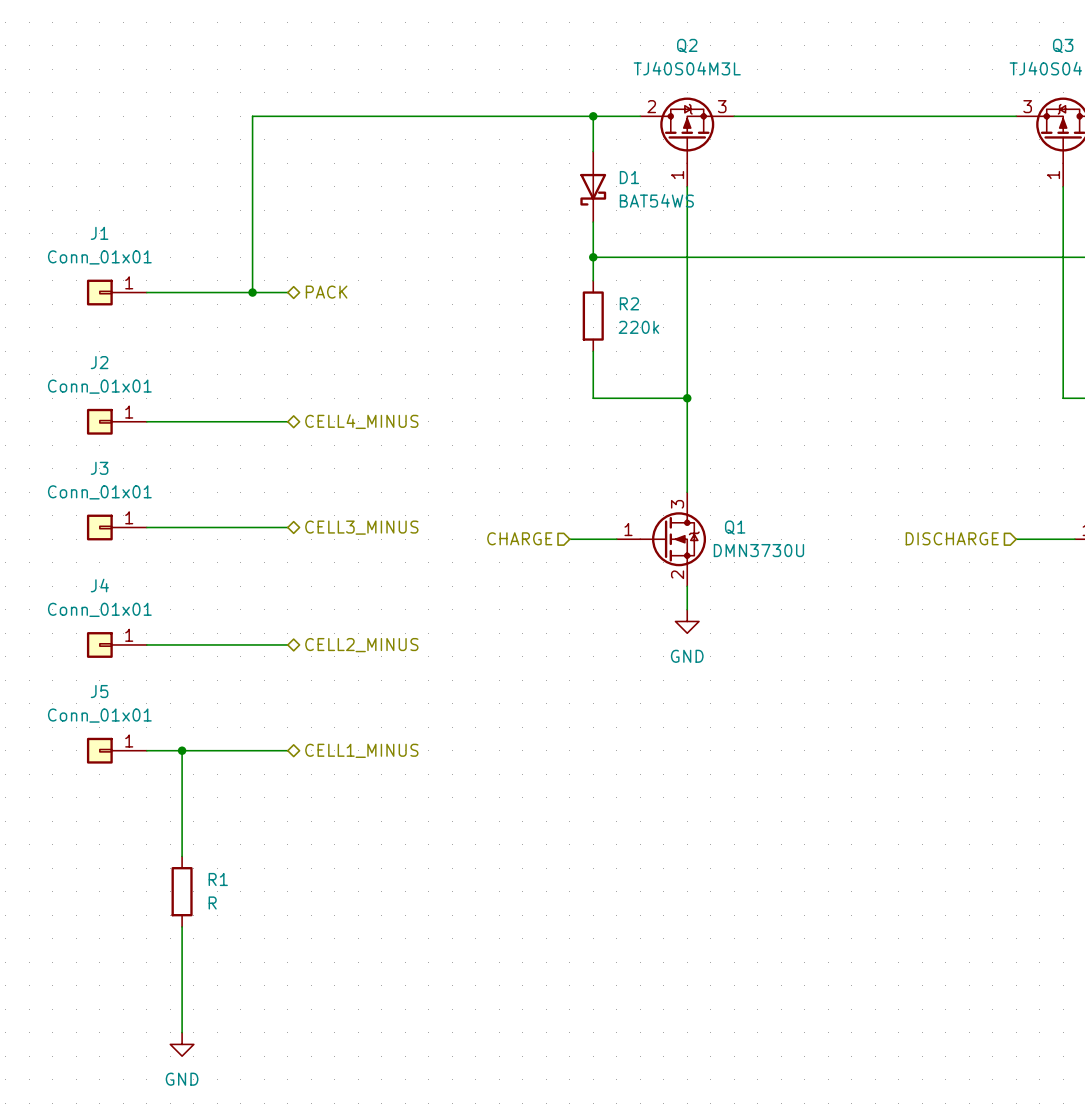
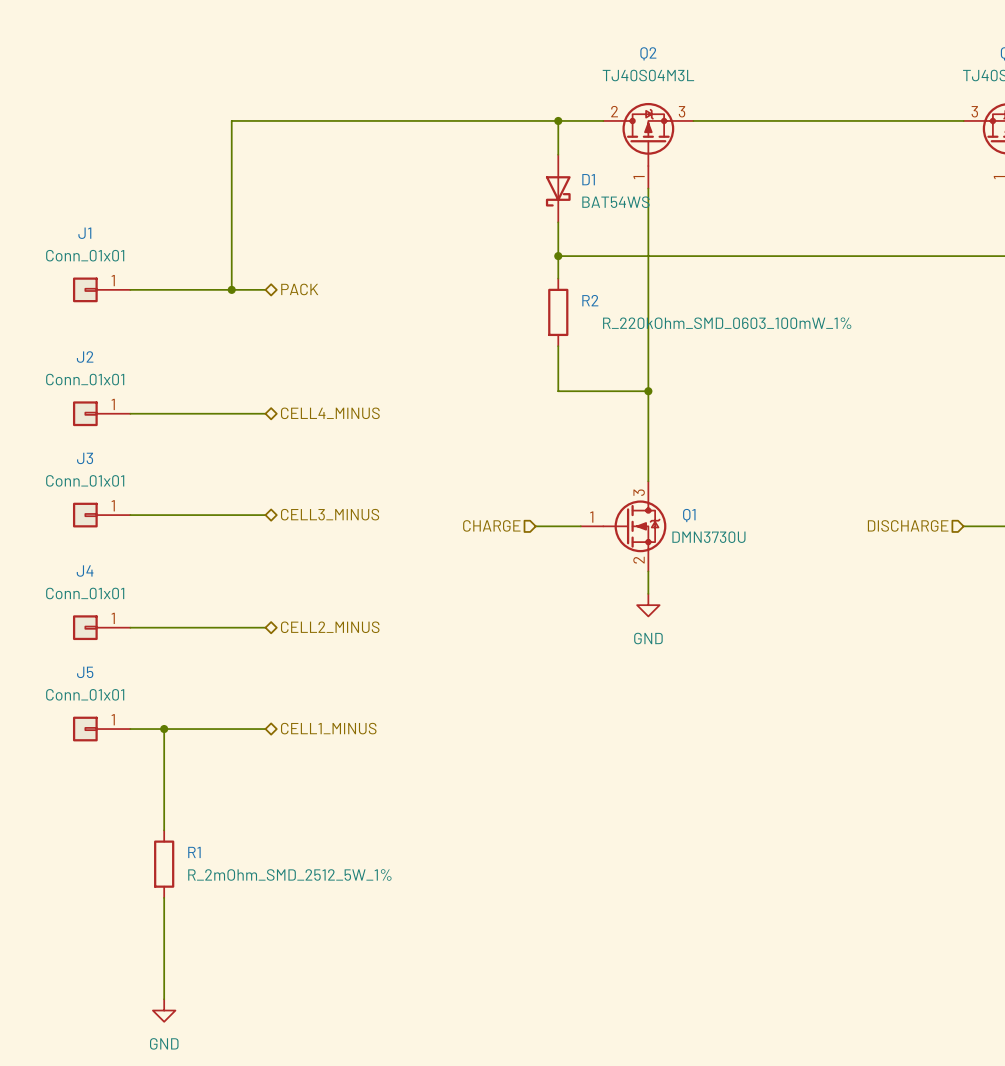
R2 value: 220k (638, 327) -> R_220kOhm_SMD_0603_100mW_1% (727, 323)
R1 value: R (212, 902) -> R_2mOhm_SMD_2512_5W_1% (289, 874)

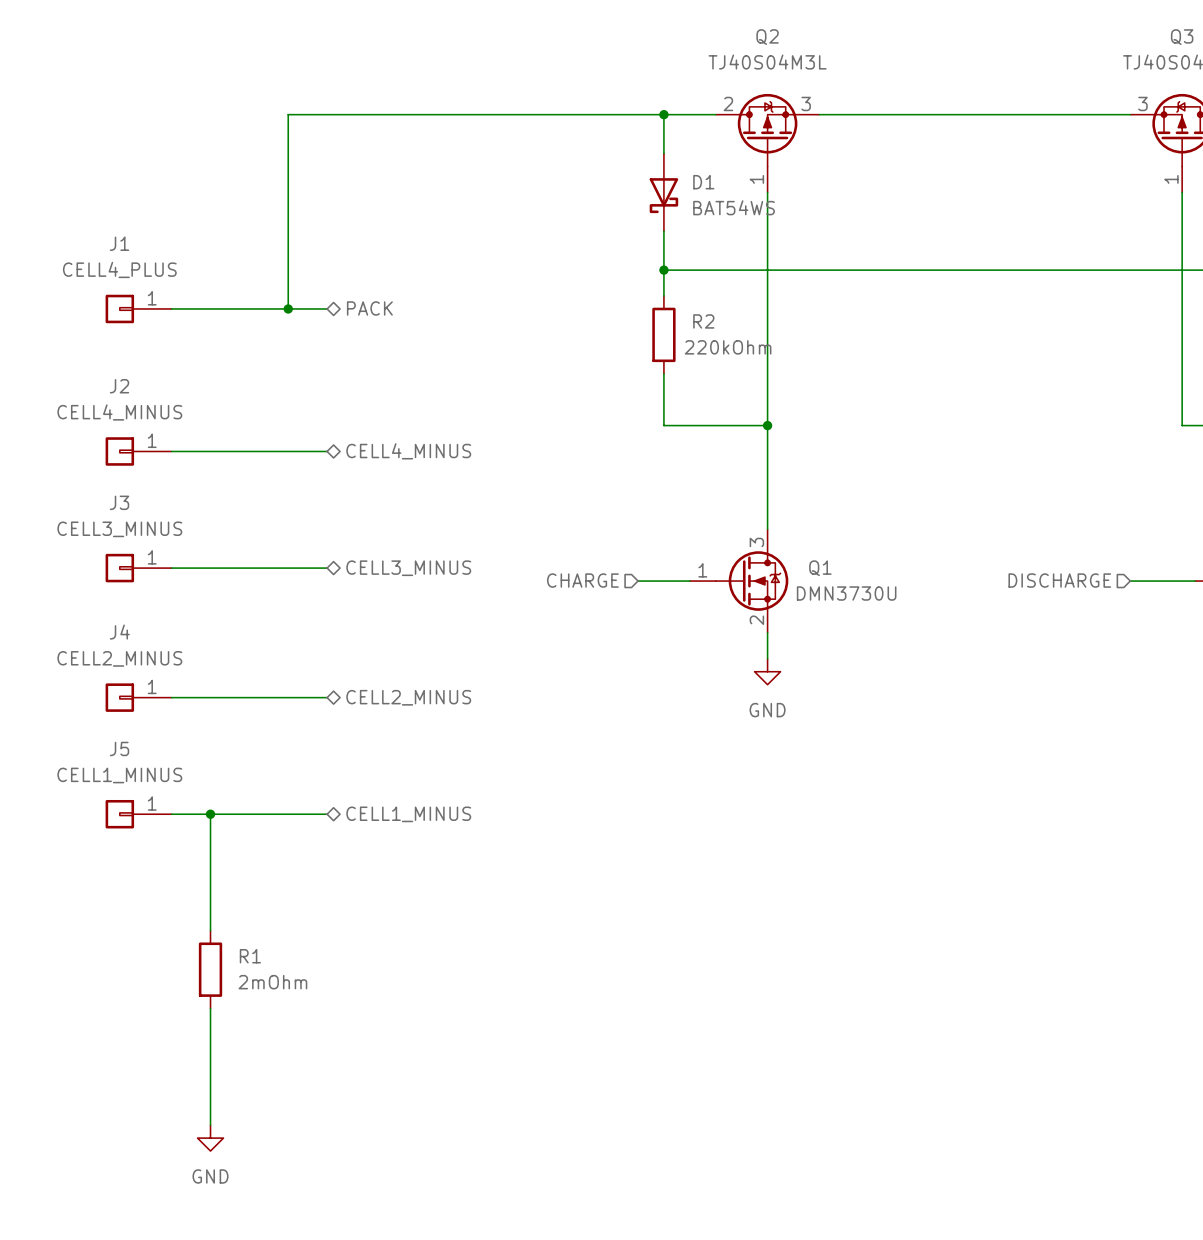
J1 value: Conn_01x01 (85, 255) -> CELL4_PLUS (119, 269)
R2 value: R_220kOhm_SMD_0603_100mW_1% (727, 323) -> 220kOhm (728, 347)
J2 value: Conn_01x01 (85, 379) -> CELL4_MINUS (119, 412)
J3 value: Conn_01x01 (85, 480) -> CELL3_MINUS (119, 529)
J4 value: Conn_01x01 (85, 593) -> CELL2_MINUS (119, 658)
J5 value: Conn_01x01 (85, 694) -> CELL1_MINUS (119, 775)
R1 value: R_2mOhm_SMD_2512_5W_1% (289, 874) -> 2mOhm (272, 982)

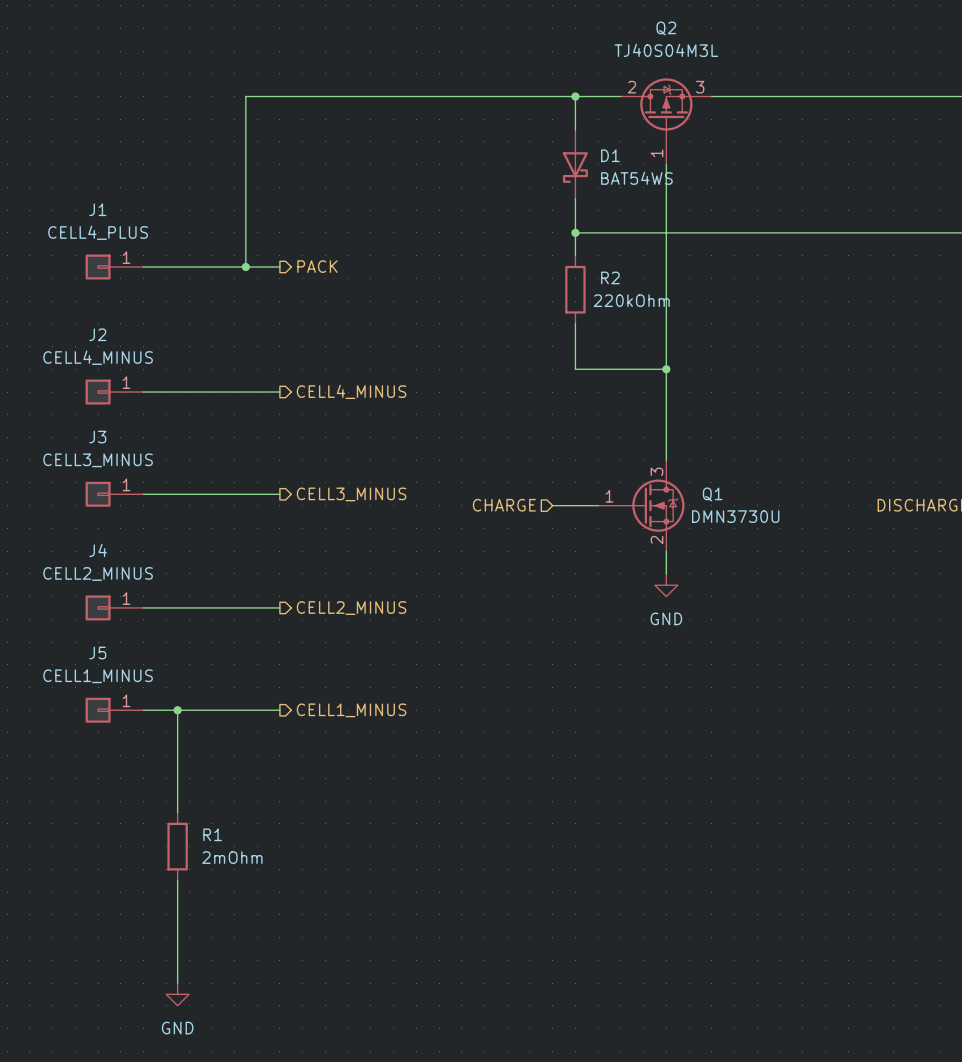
hierarchical label shape: bidirectional (369, 308) -> output (317, 266)
hierarchical label shape: bidirectional (408, 451) -> output (351, 391)
hierarchical label shape: bidirectional (408, 568) -> output (351, 494)
hierarchical label shape: bidirectional (408, 697) -> output (351, 608)
hierarchical label shape: bidirectional (408, 814) -> output (351, 710)

